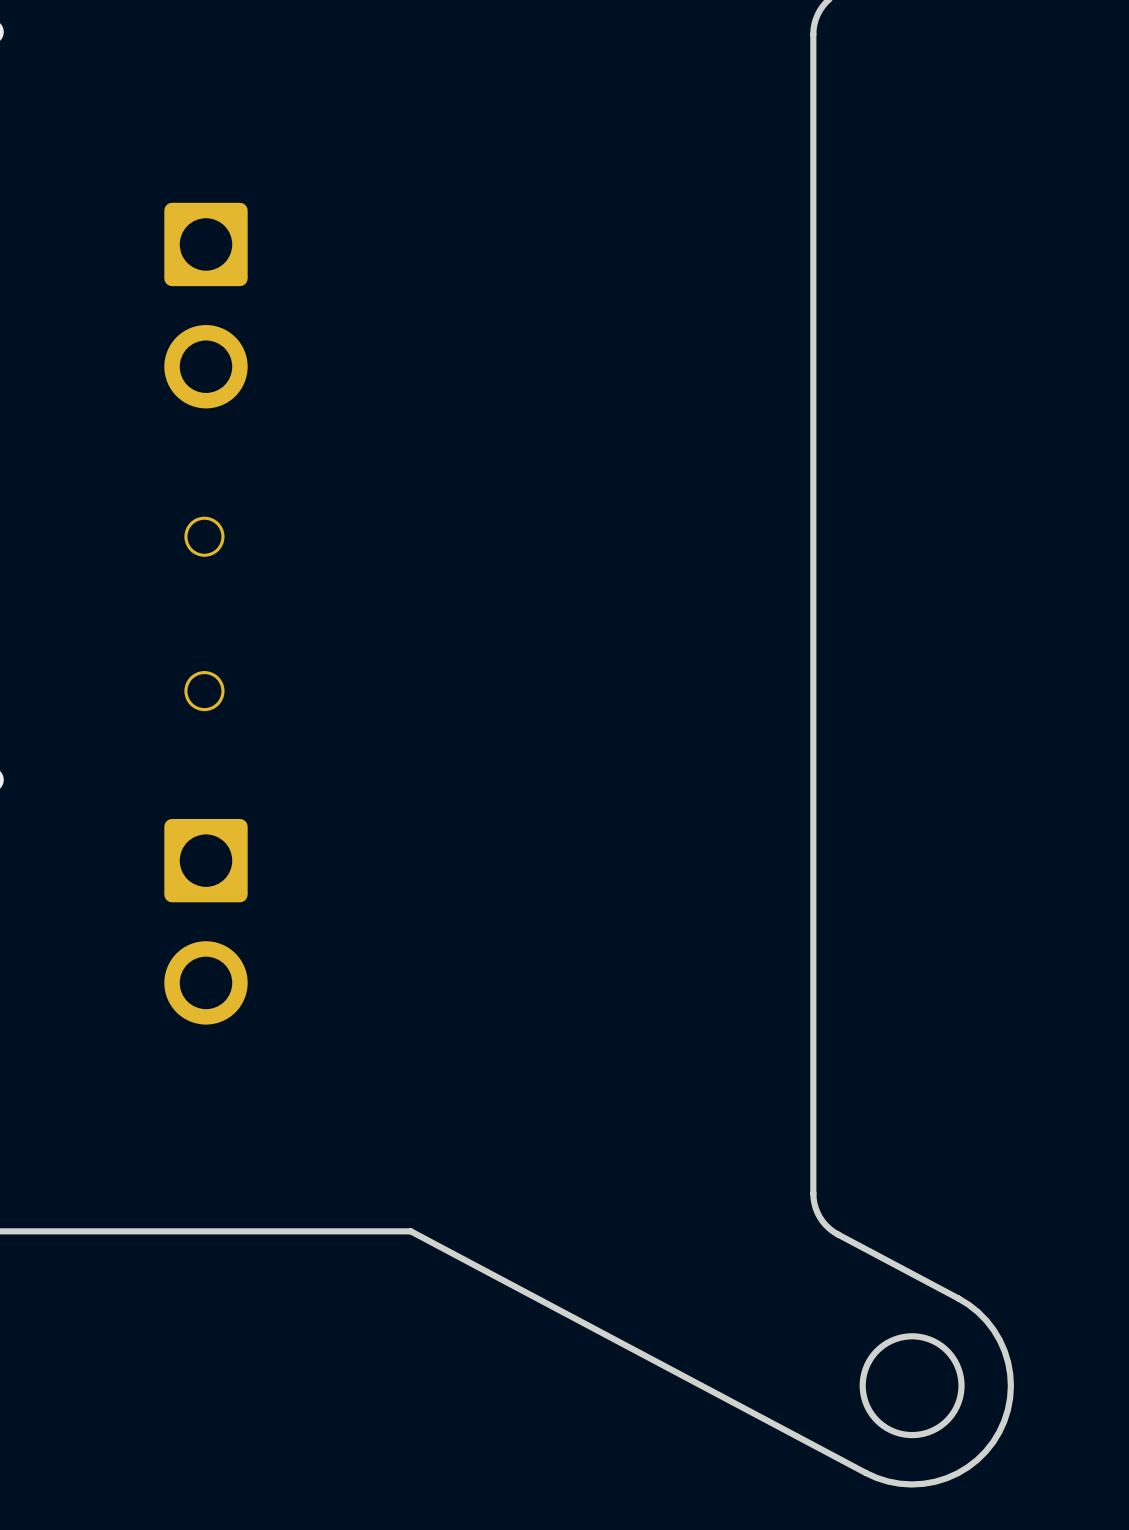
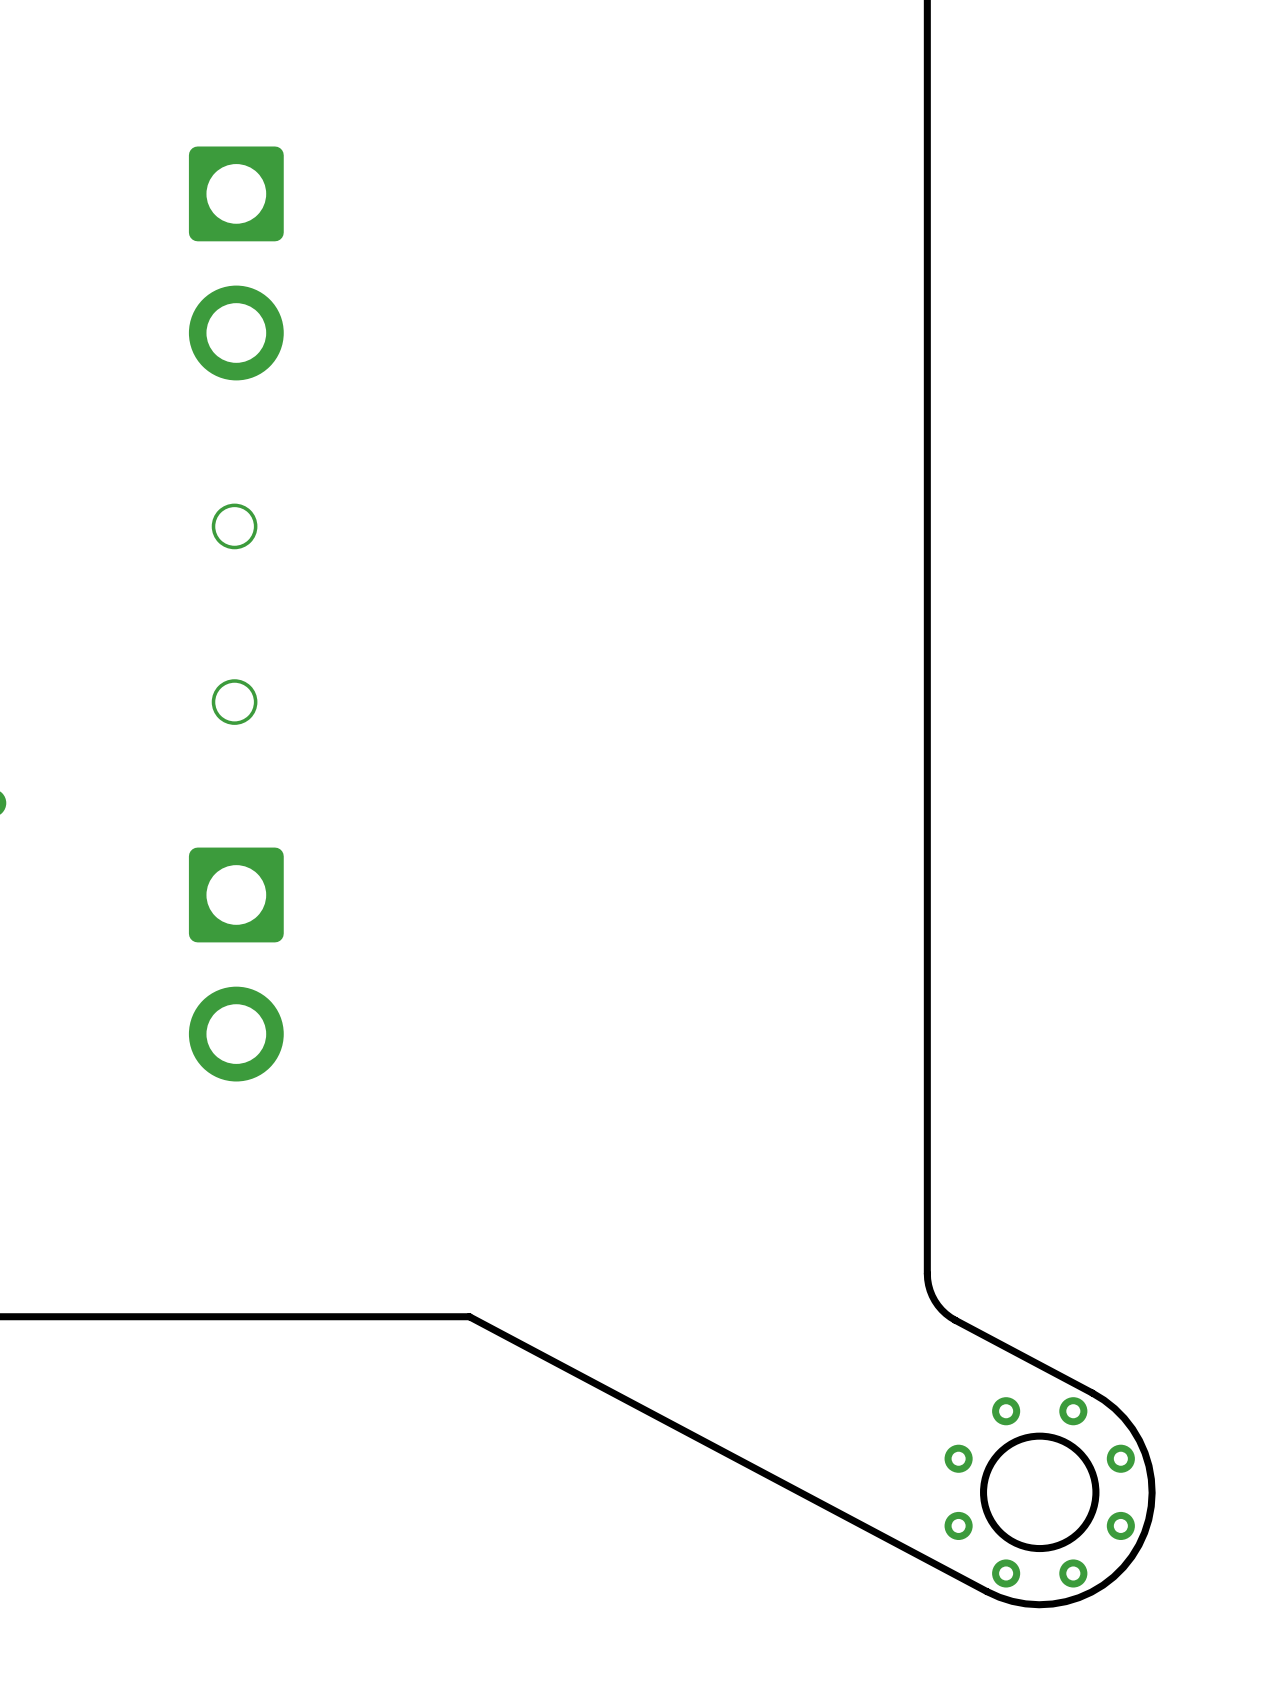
via: none -> (1006, 1411)
via: none -> (1073, 1411)
via: none -> (958, 1458)
via: none -> (1120, 1458)
via: none -> (958, 1525)
via: none -> (1120, 1525)
via: none -> (1006, 1573)
via: none -> (1073, 1573)

